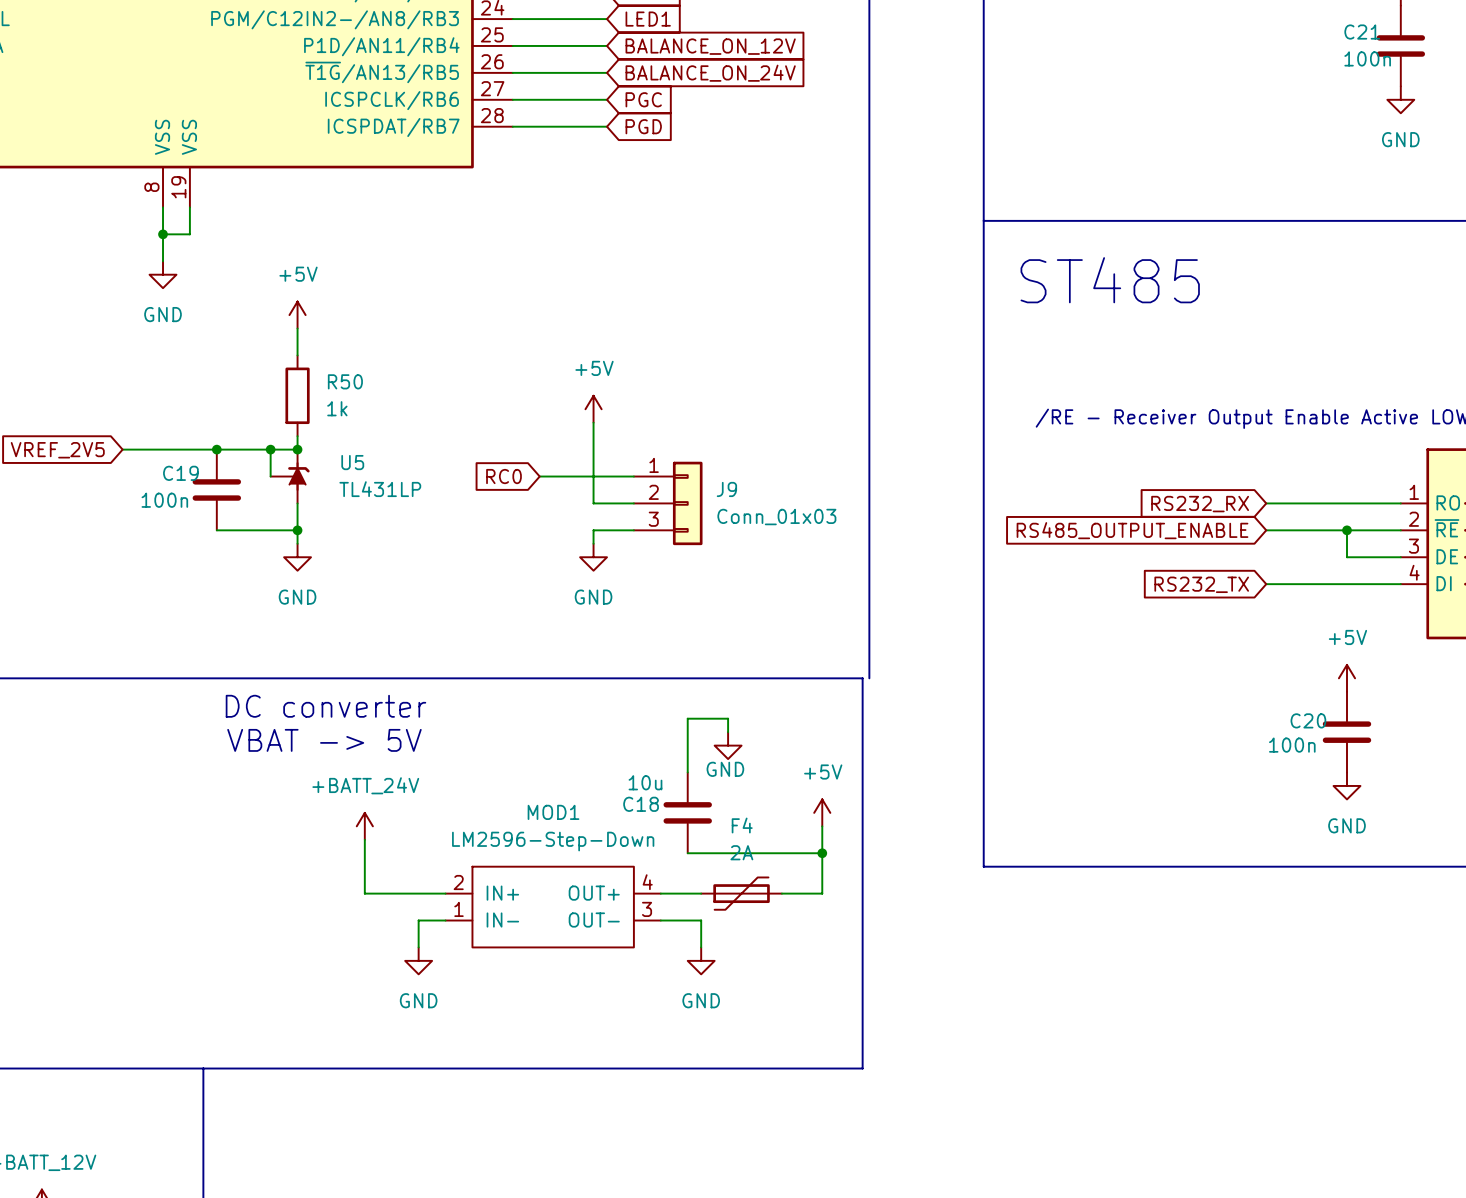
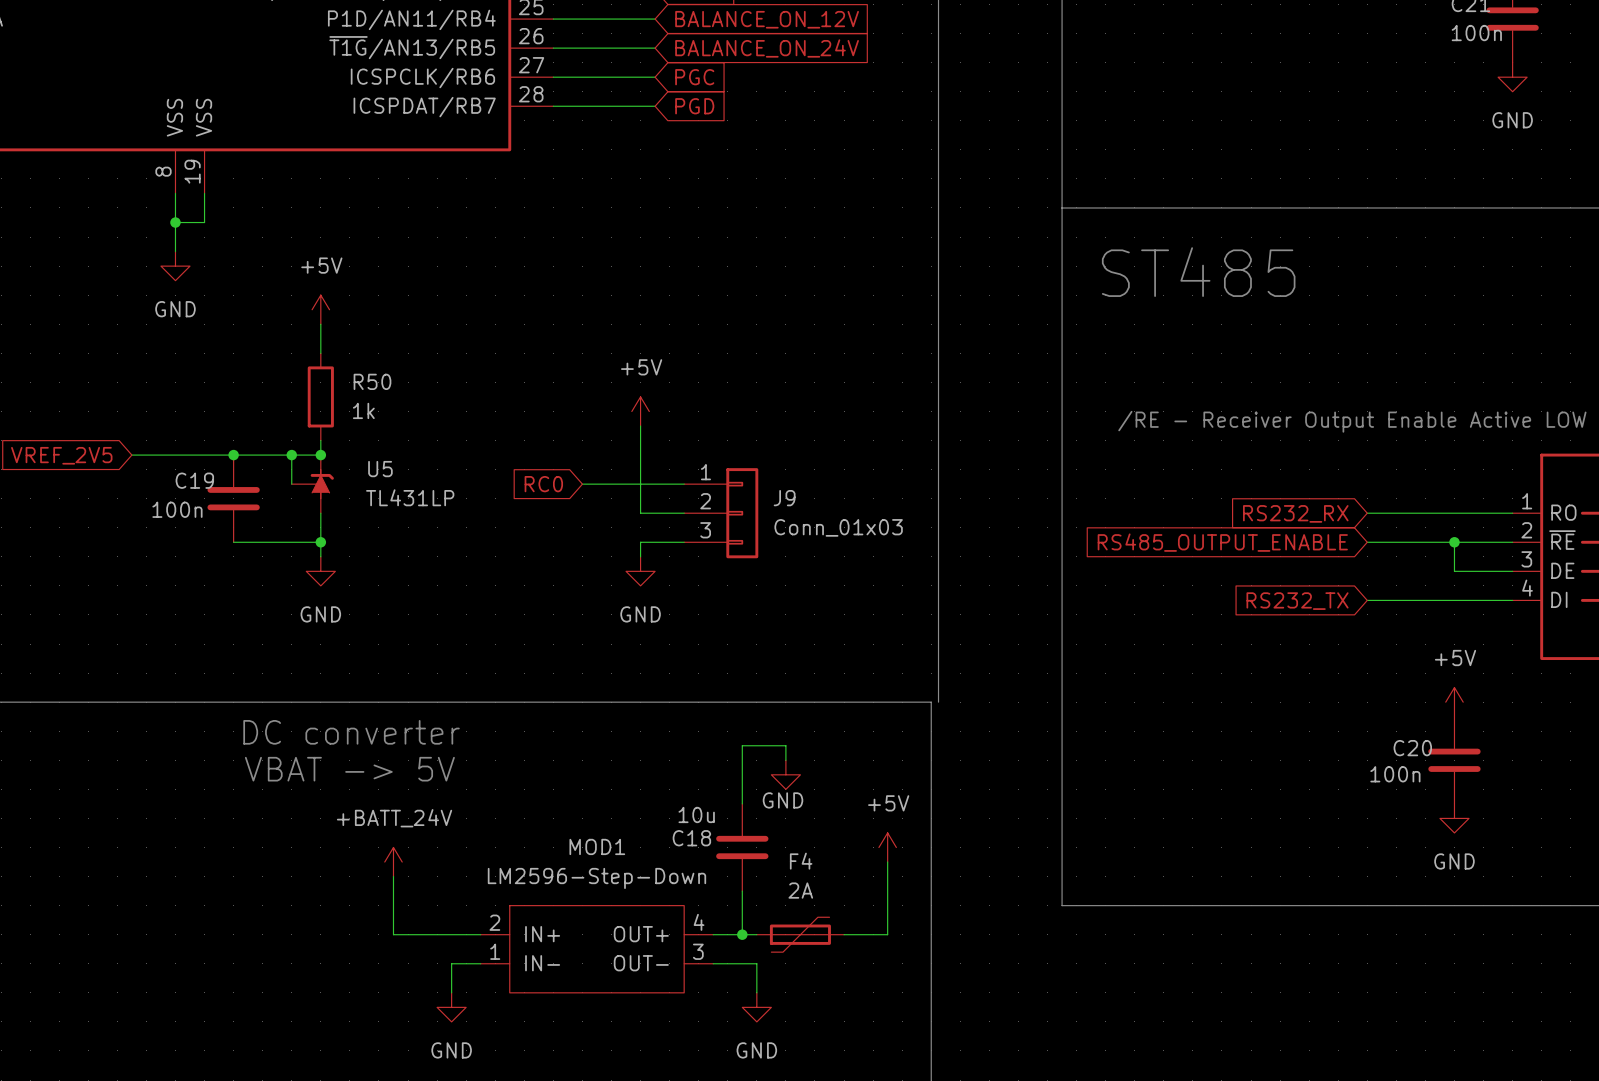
wire: (687, 853) (822, 853) -> (742, 891) (742, 934)
junction: (822, 853) -> none
junction: none -> (742, 934)

